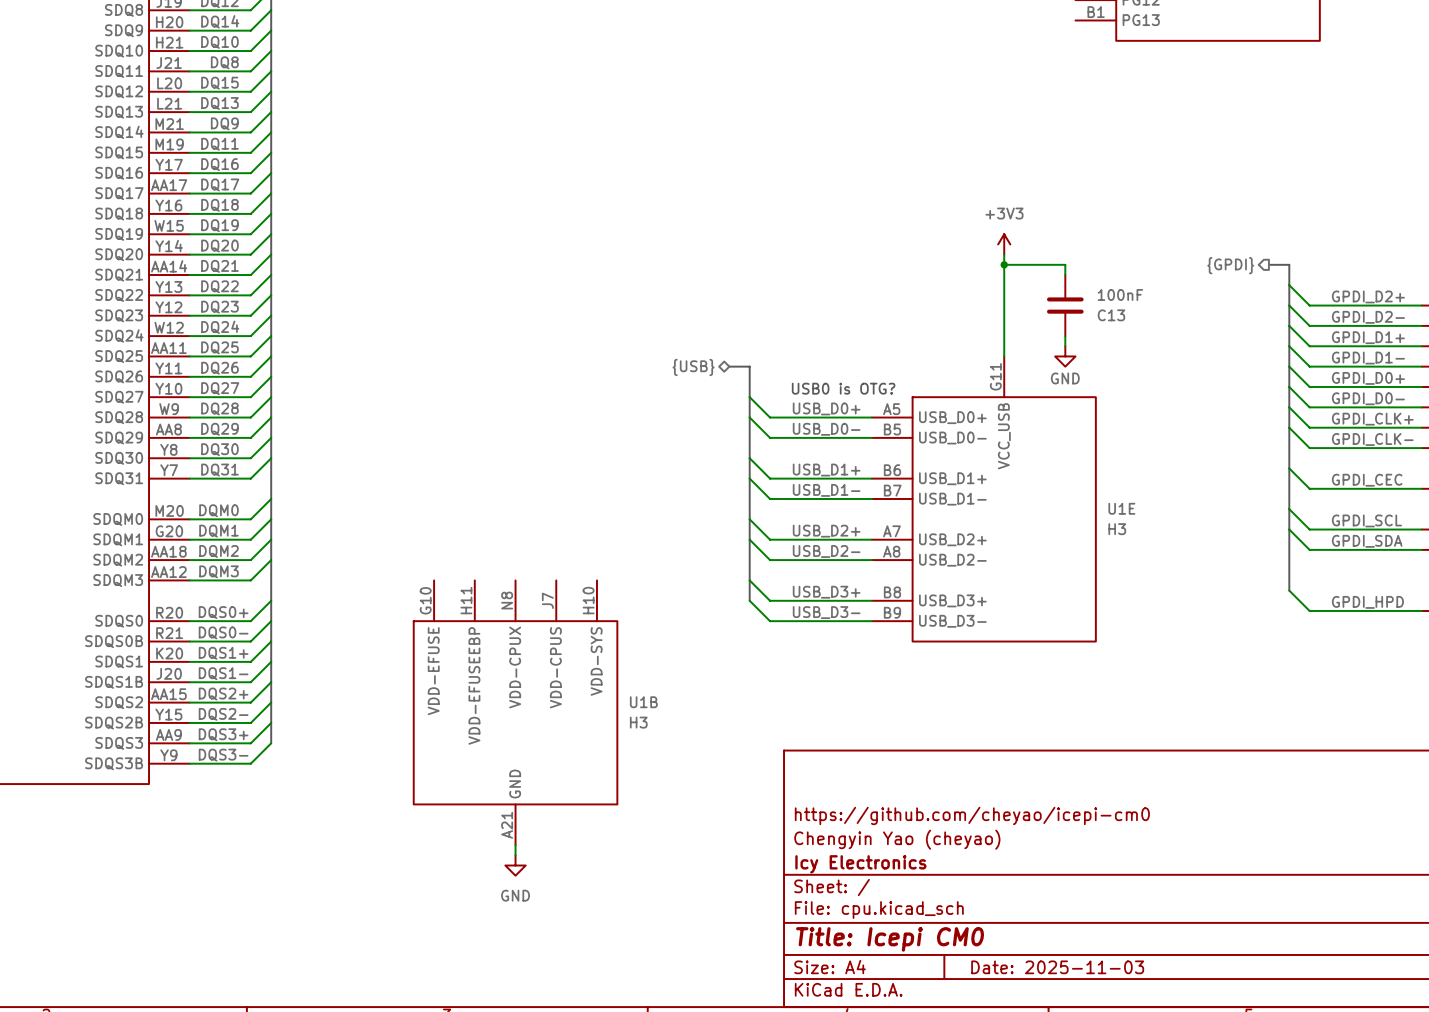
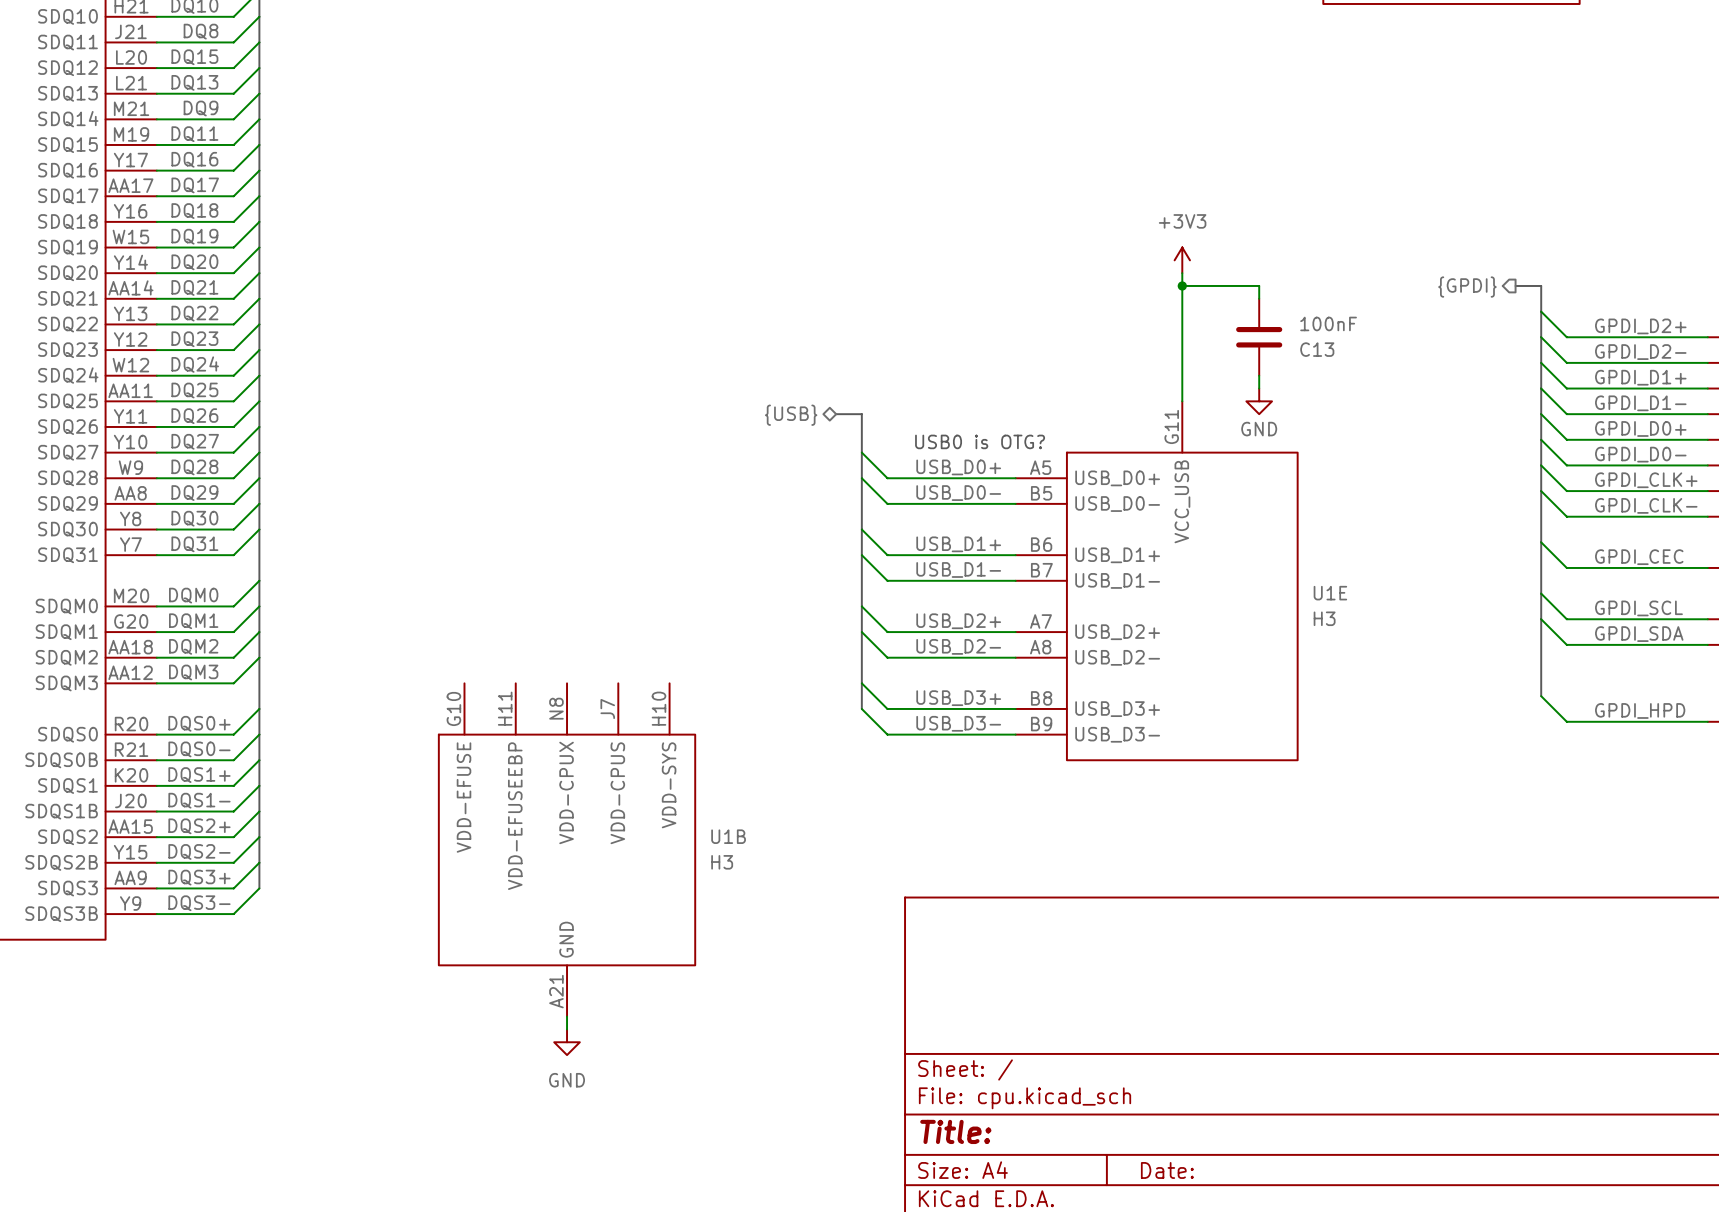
title block: https://github.com/cheyao/icepi-cm0 (972, 815) -> none
title block: Chengyin Yao (cheyao) (897, 839) -> none
title block: Icy Electronics (860, 864) -> none
title block: Title: Icepi CM0 (890, 939) -> Title: (955, 1131)
title block: Date: 2025-11-03 (1057, 967) -> Date: (1167, 1170)

